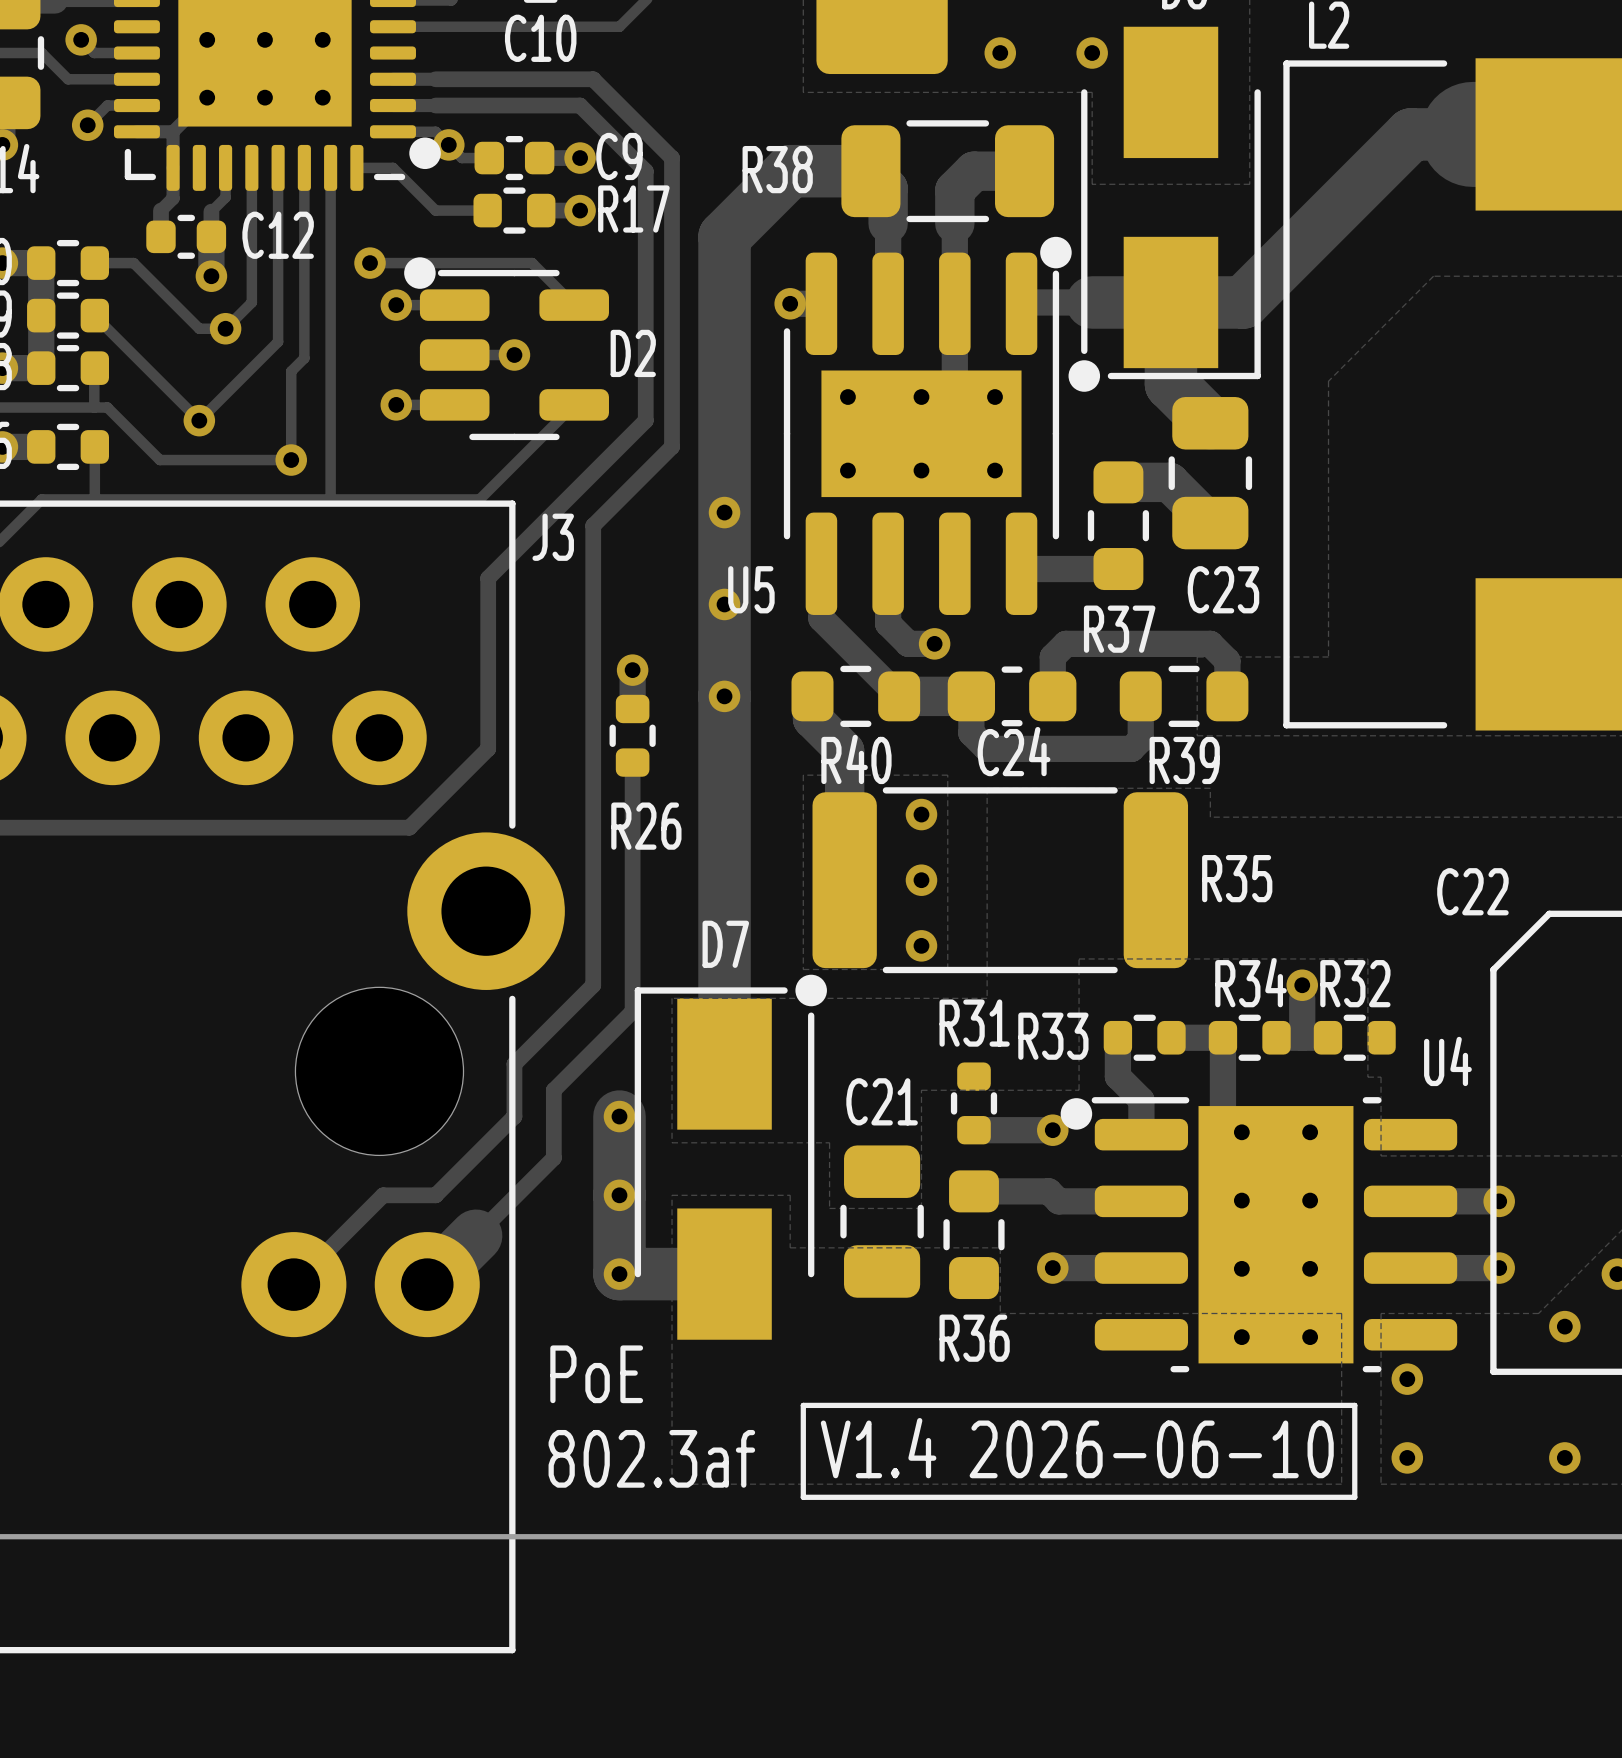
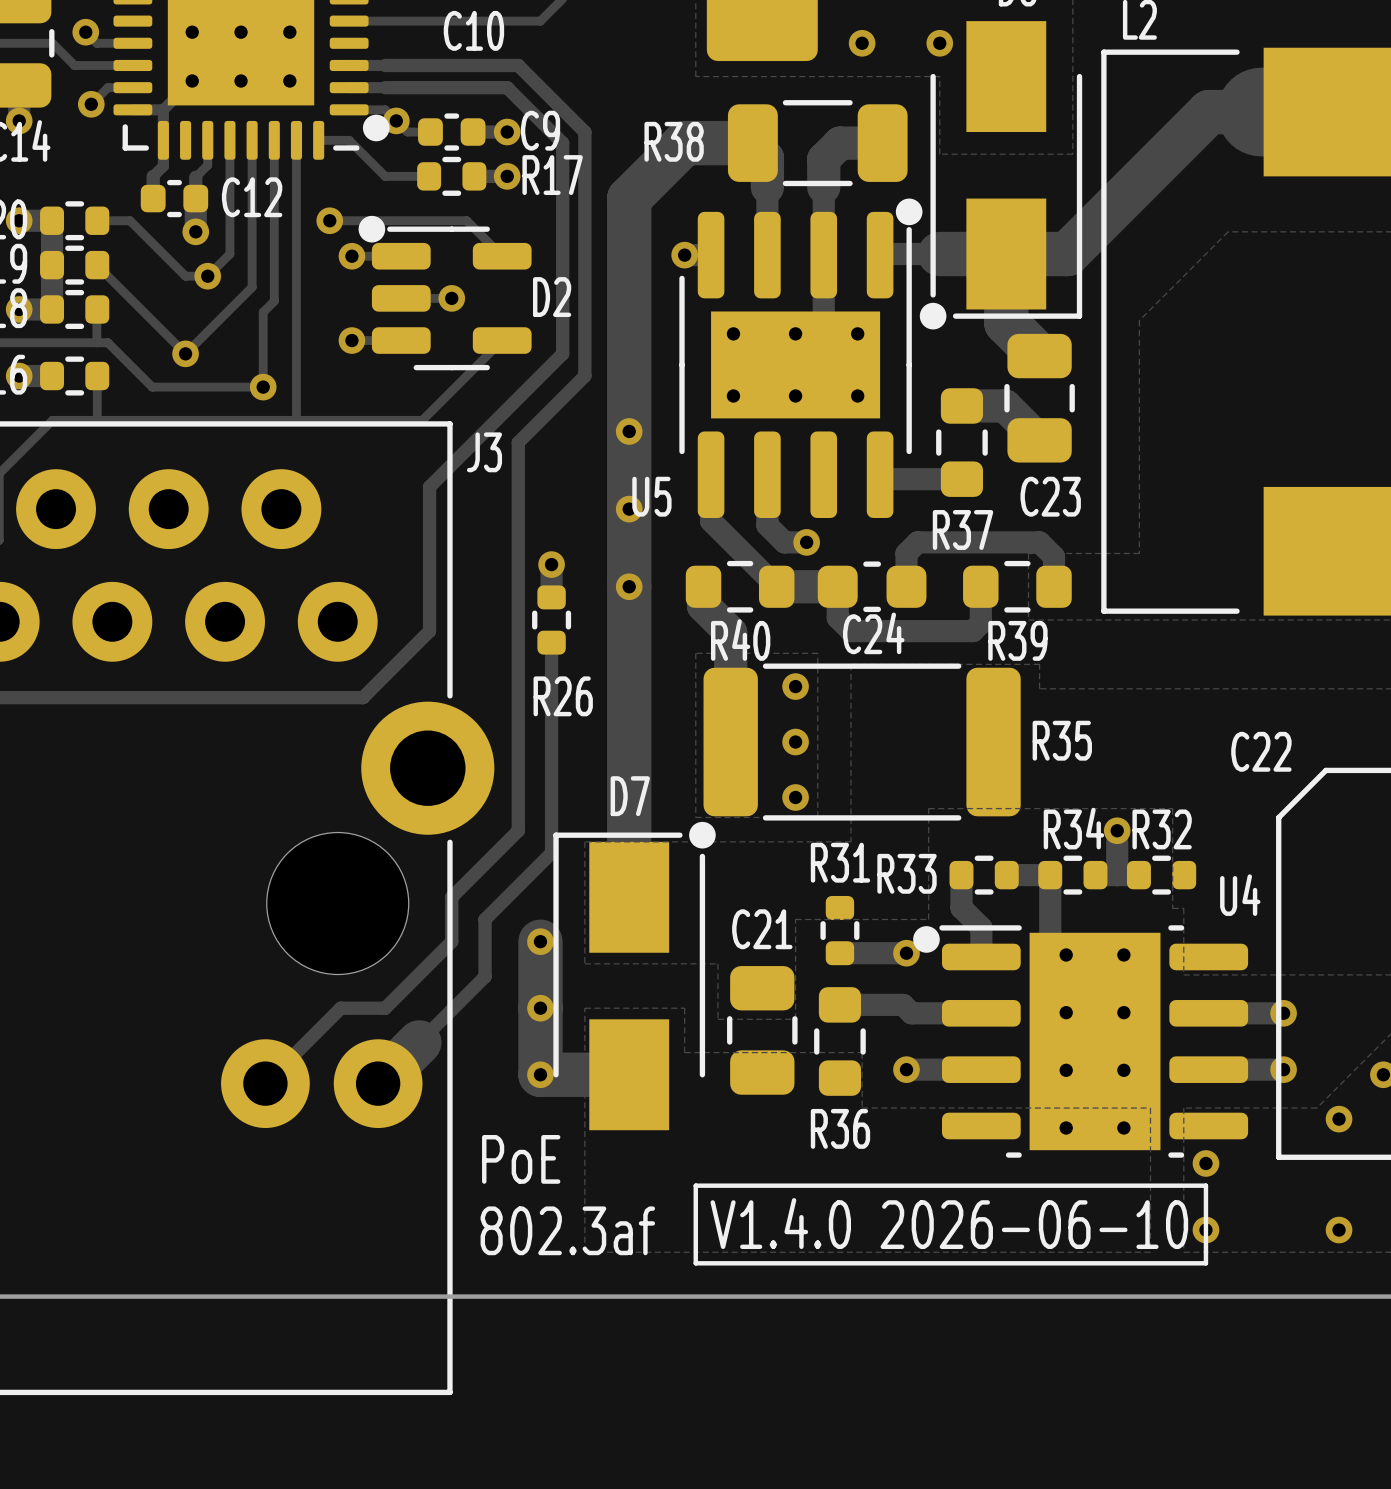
line: (1354, 1405) (1354, 1497) -> (1161, 1185) (1205, 1185) (1205, 1263) (1161, 1263)
text: V1.4 2026-06-10 (1077, 1448) -> V1.4.0 2026-06-10 (949, 1223)

